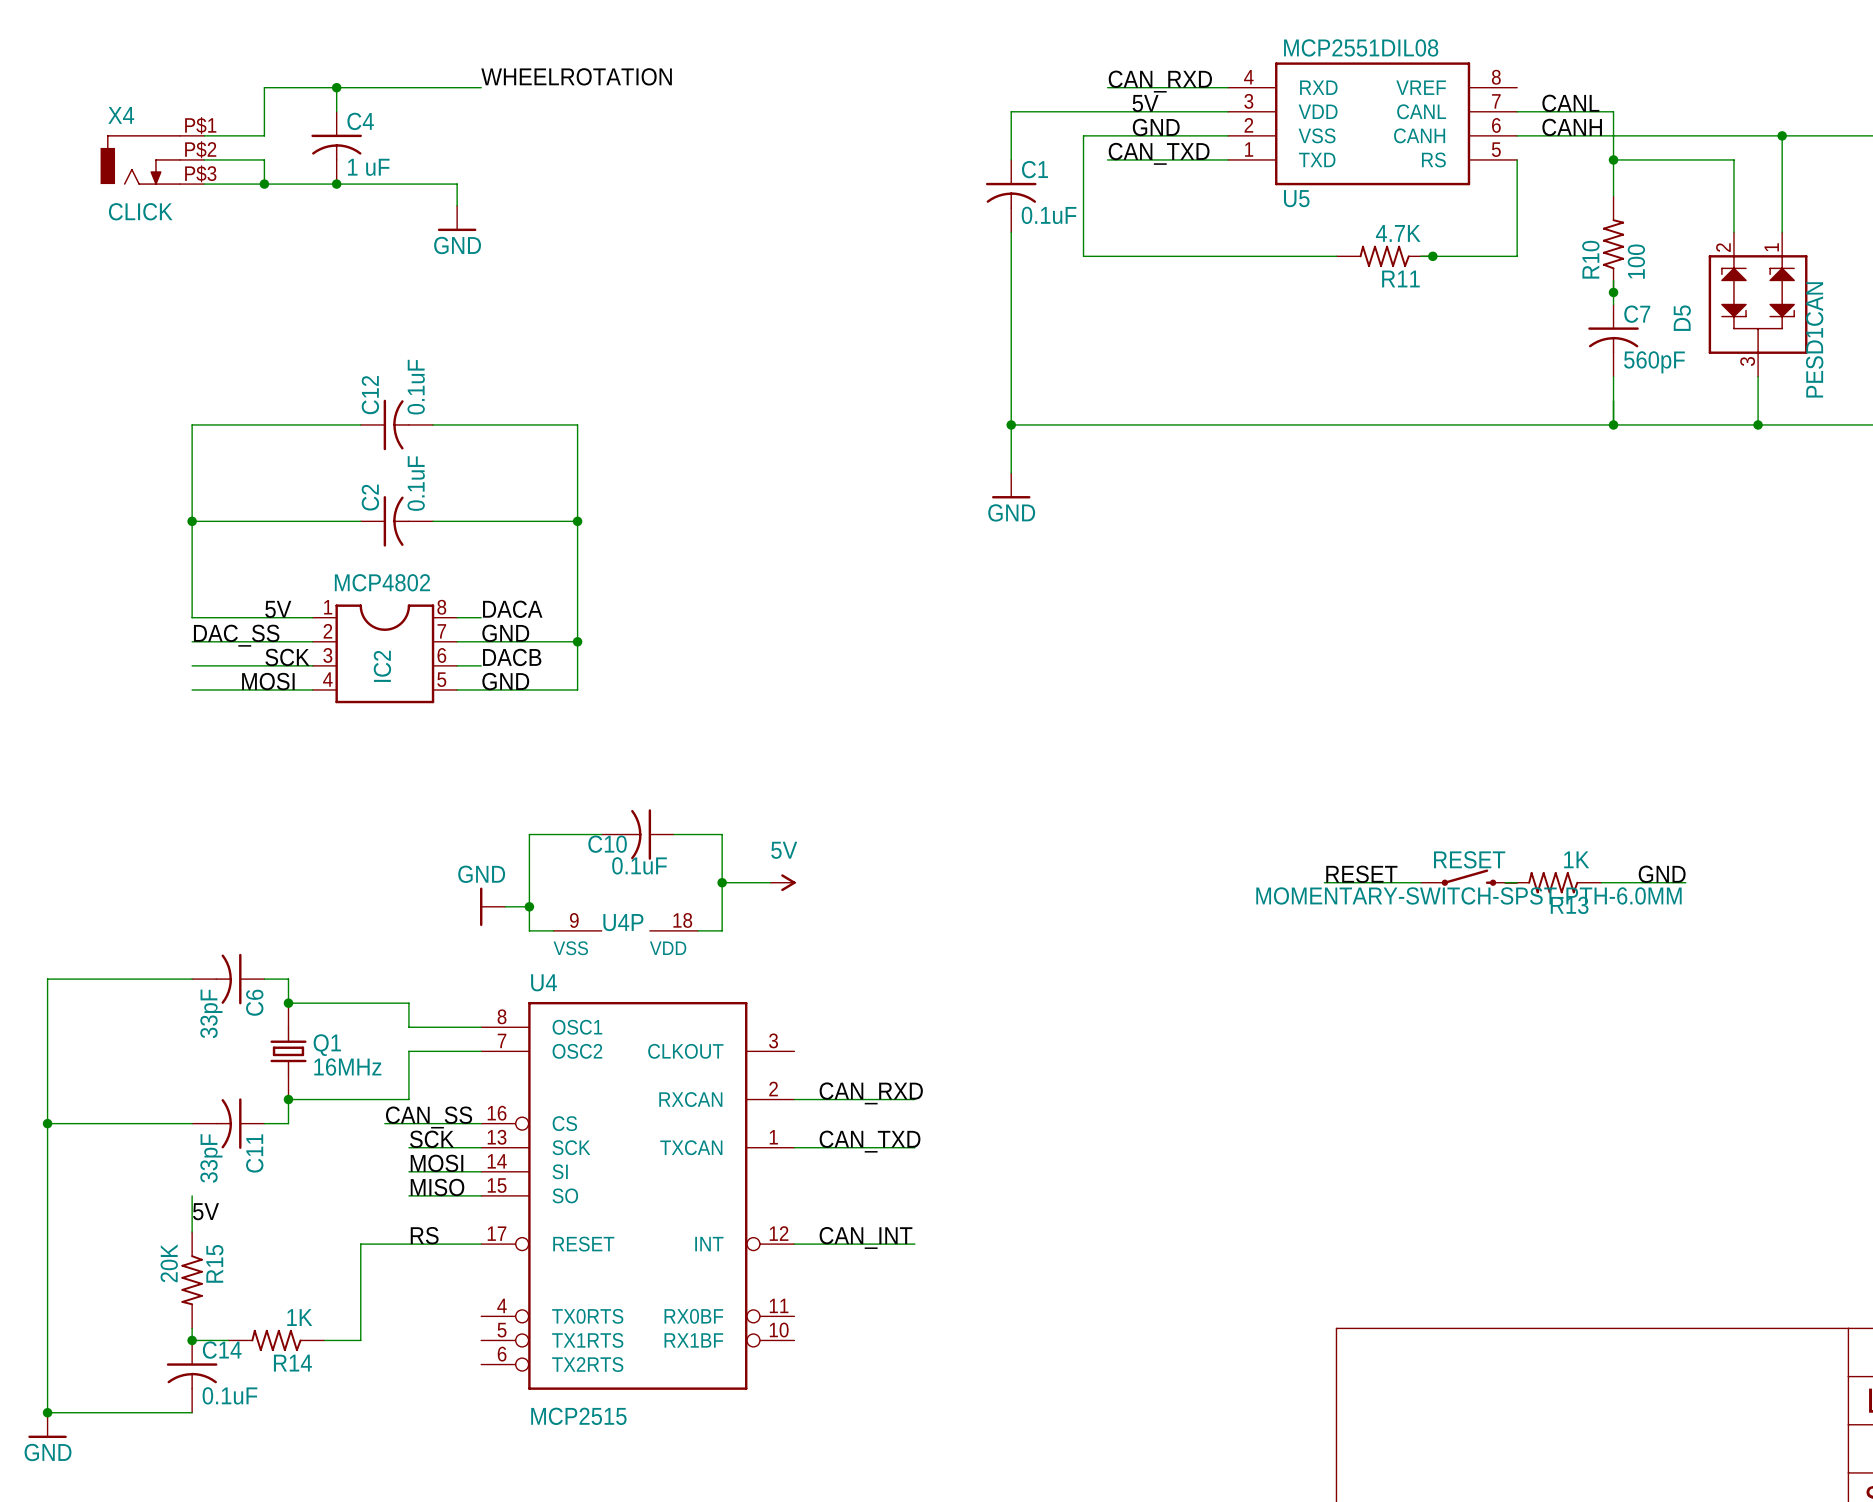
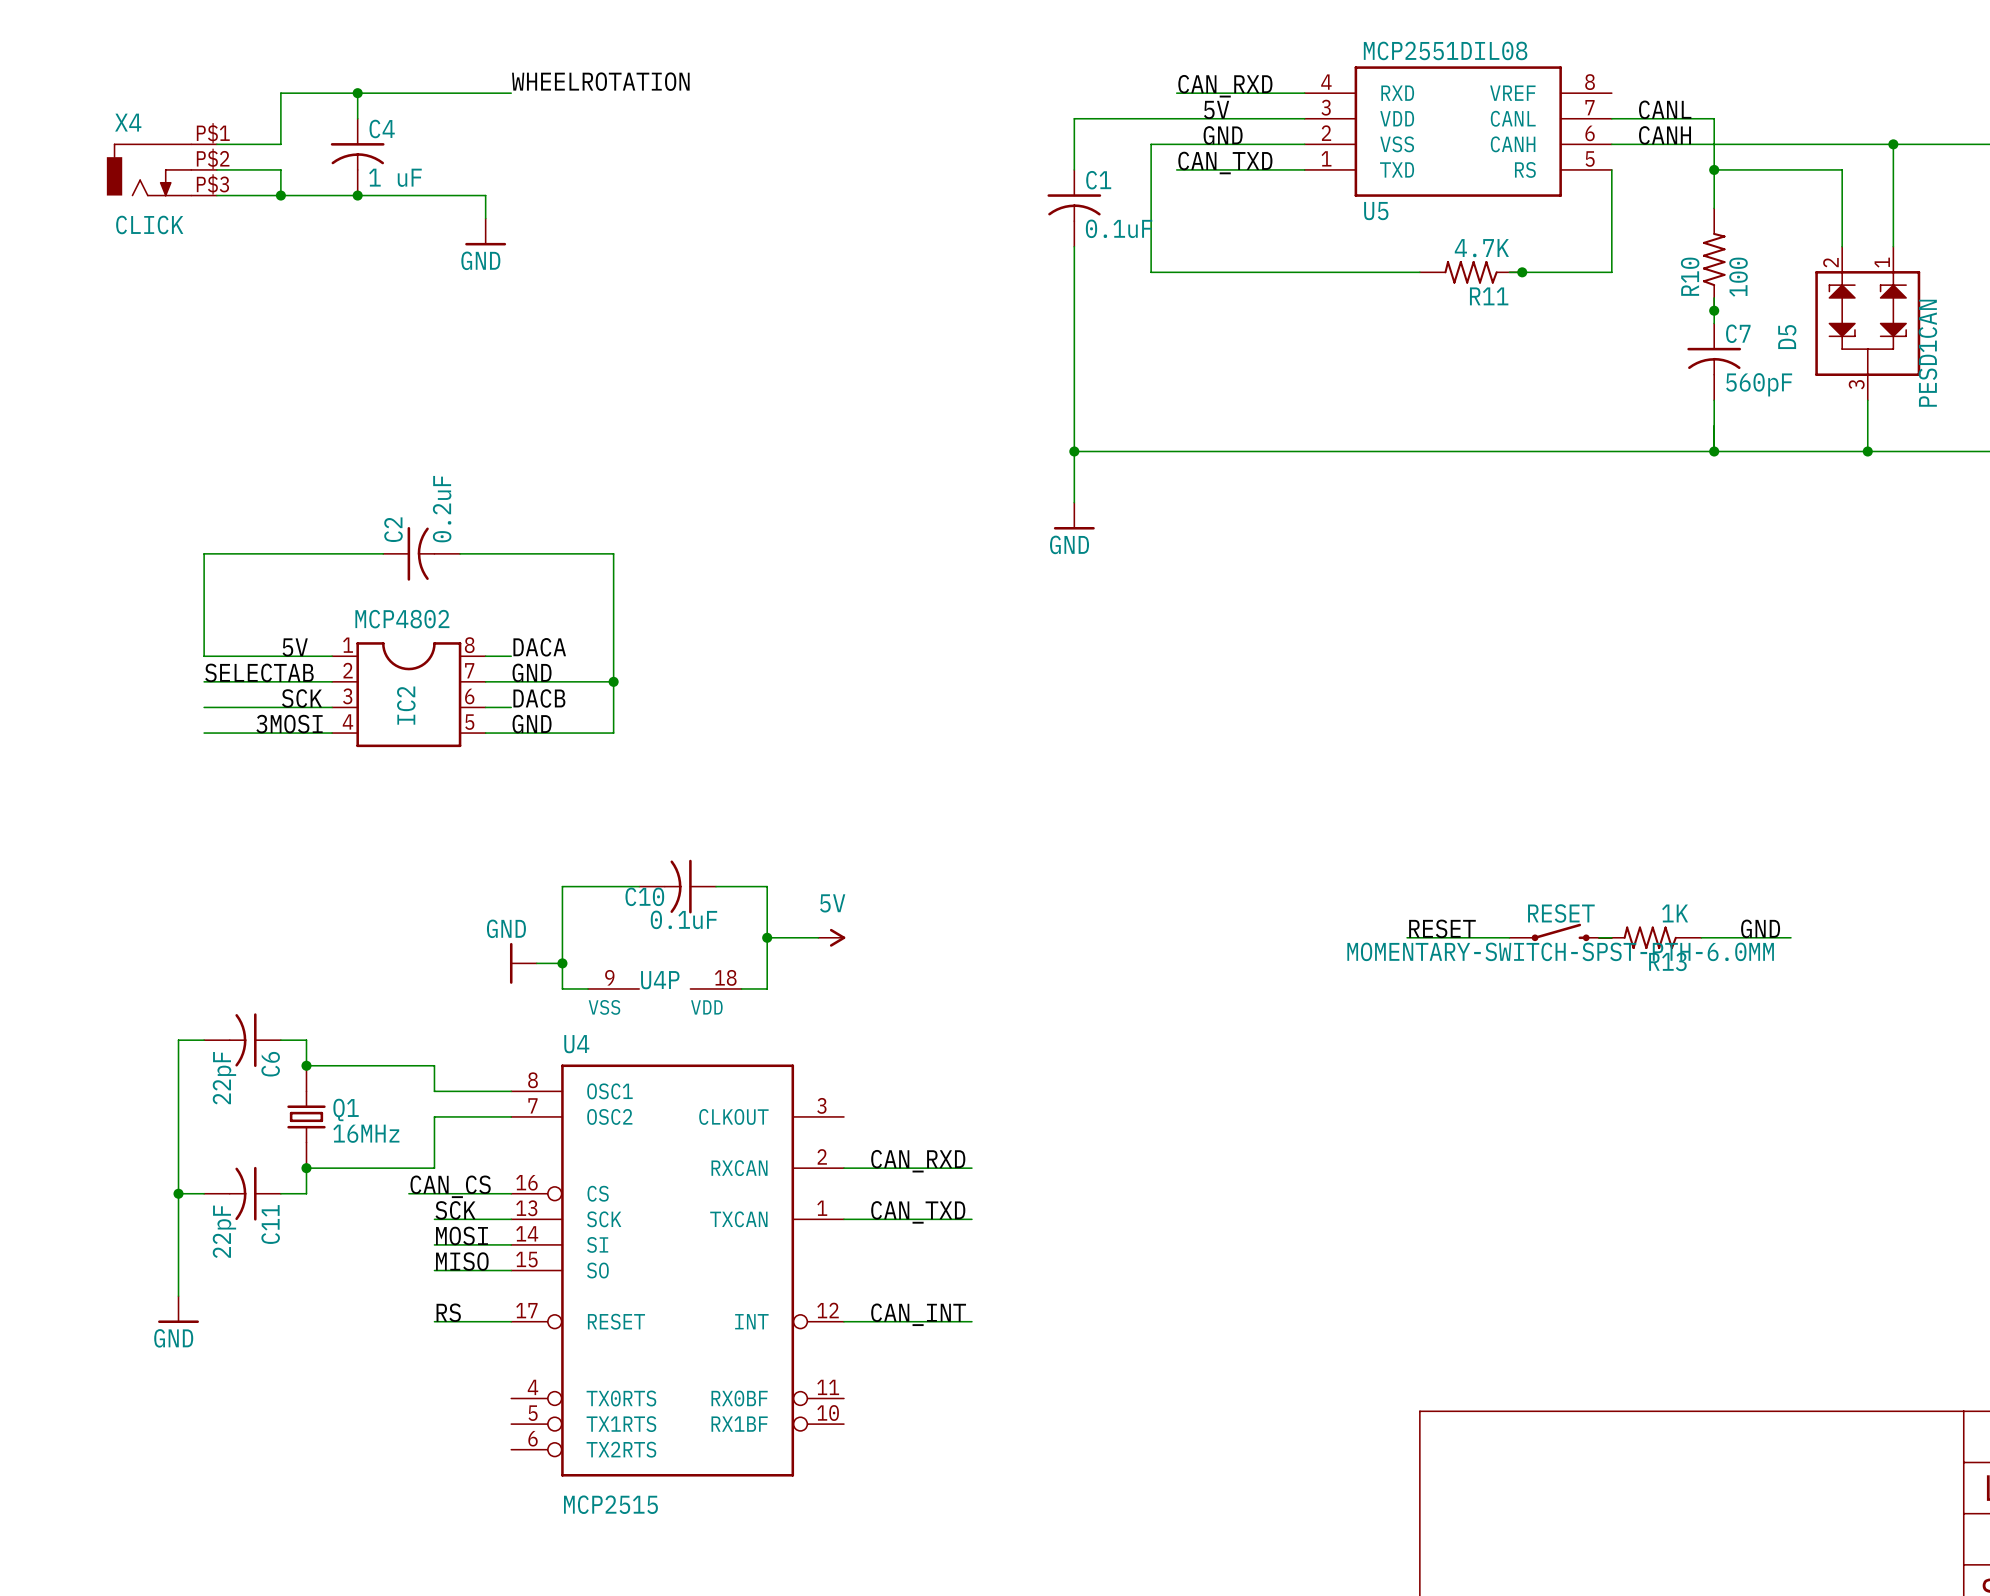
wire: (360, 424) (192, 424) (192, 521) -> none
C12: 0.1uF (396, 424) -> none
wire: (433, 424) (577, 424) (577, 521) -> none
C2 value: 0.1uF (416, 483) -> 0.2uF (442, 509)
junction: (192, 521) -> none
junction: (577, 521) -> none
label: DAC_SS (236, 635) -> SELECTAB (259, 672)
label: MOSI (268, 681) -> 3MOSI (289, 724)
wire: (168, 979) (47, 979) (47, 1412) (192, 1412) -> (178, 1040) (178, 1296)
C6 value: 33pF (211, 1013) -> 22pF (224, 1078)
label: CAN_SS (429, 1117) -> CAN_CS (450, 1186)
wire: (47, 1123) (168, 1123) -> none
junction: (47, 1123) -> none
junction: none -> (178, 1193)
C11 value: 33pF (211, 1158) -> 22pF (224, 1231)
wire: (192, 1195) (192, 1232) -> none
label: 5V (206, 1211) -> none
wire: (408, 1244) (360, 1244) (360, 1340) (324, 1340) -> none
R15: 20K (192, 1280) -> none
wire: (192, 1328) (192, 1340) (228, 1340) -> none
junction: (192, 1340) -> none
R14: 1K (276, 1340) -> none
C14: 0.1uF (192, 1376) -> none
junction: (47, 1412) -> none
power symbol position: GND (47, 1425) -> GND (178, 1309)

